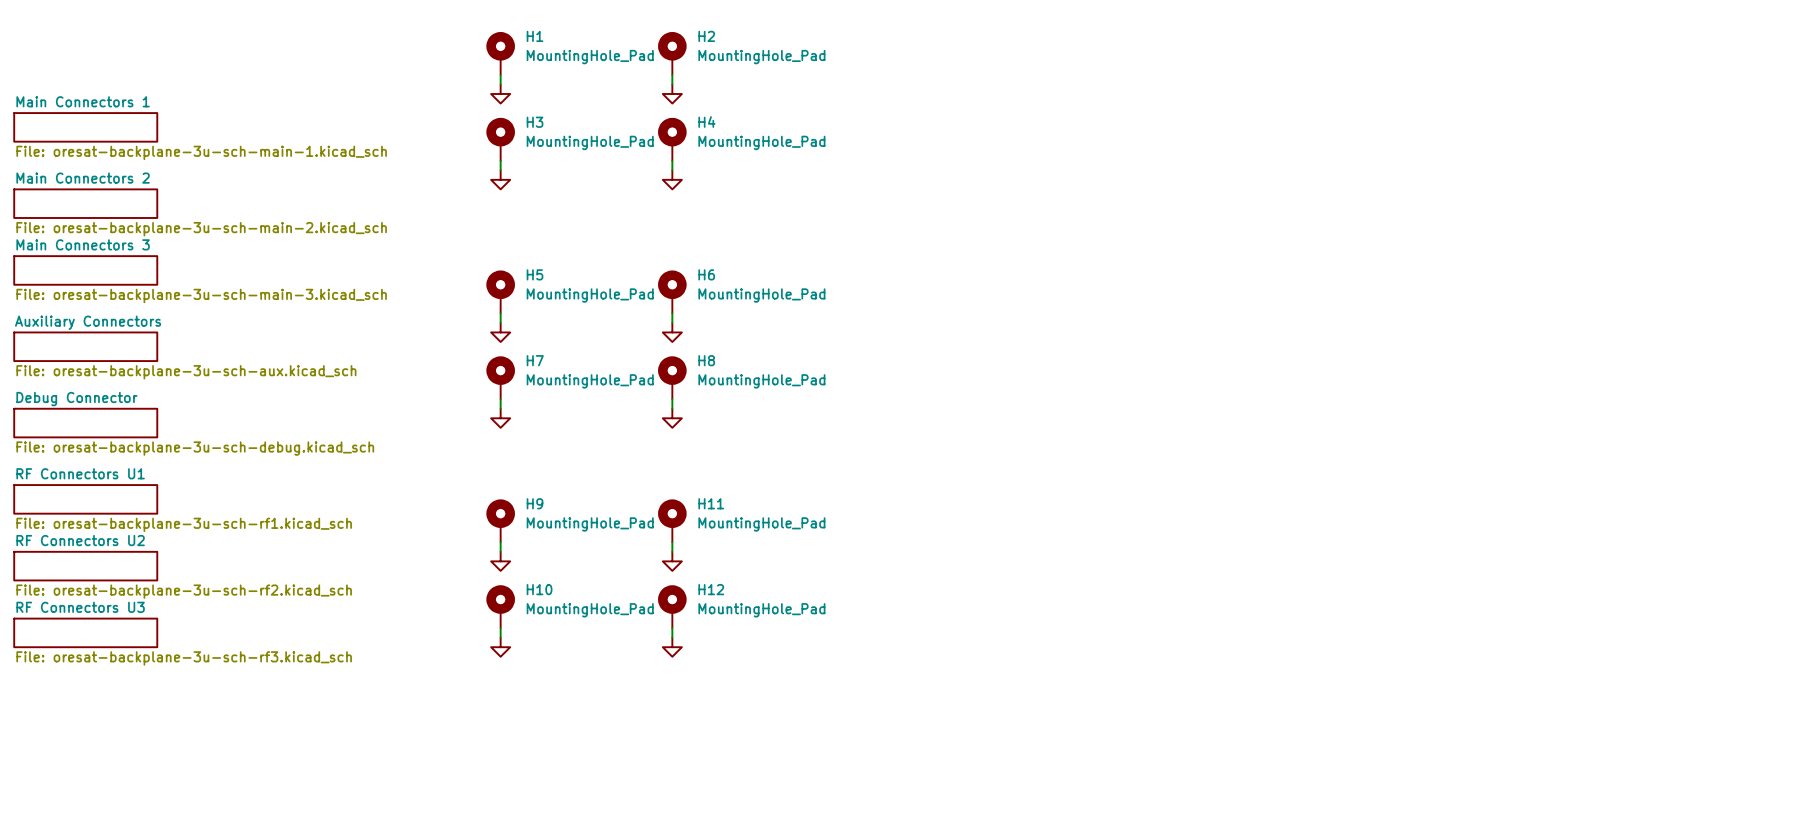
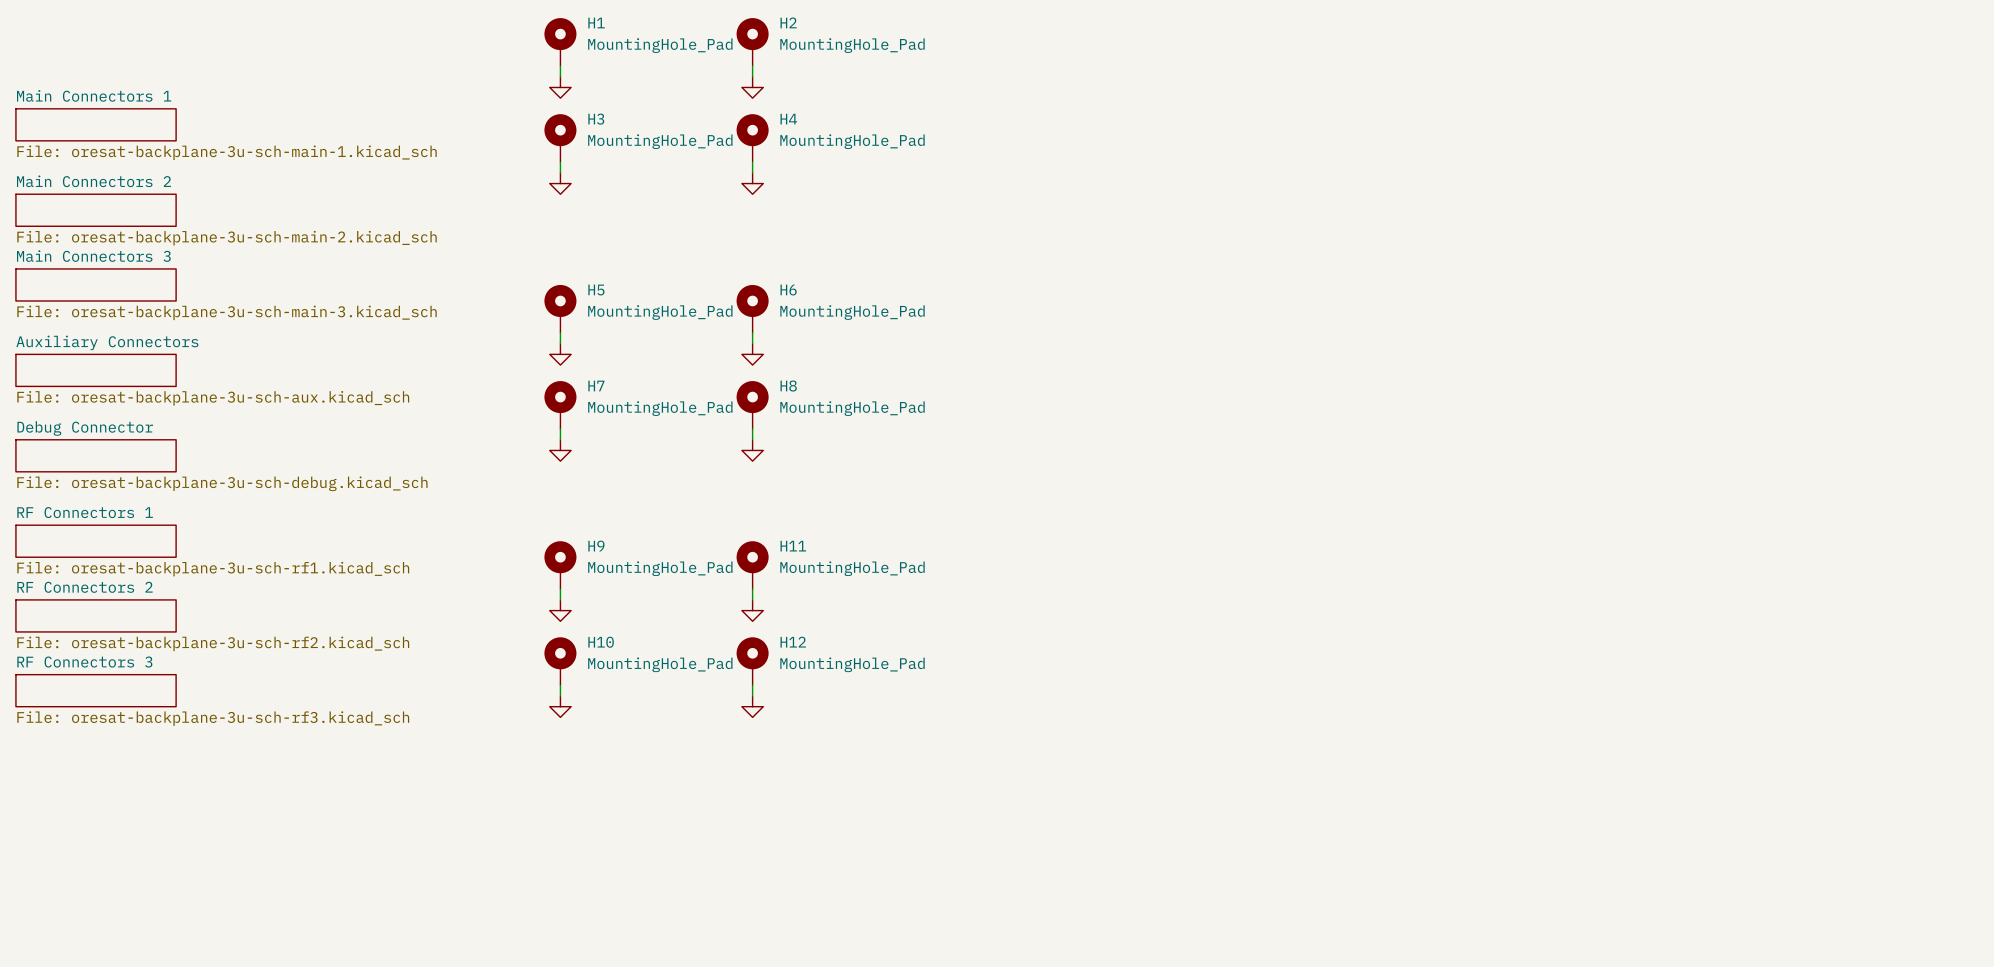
sheet RF Connectors U1 name: RF Connectors U1 (80, 473) -> RF Connectors 1 (85, 512)
sheet RF Connectors U2 name: RF Connectors U2 (80, 540) -> RF Connectors 2 (84, 587)
sheet RF Connectors U3 name: RF Connectors U3 (80, 607) -> RF Connectors 3 (84, 662)

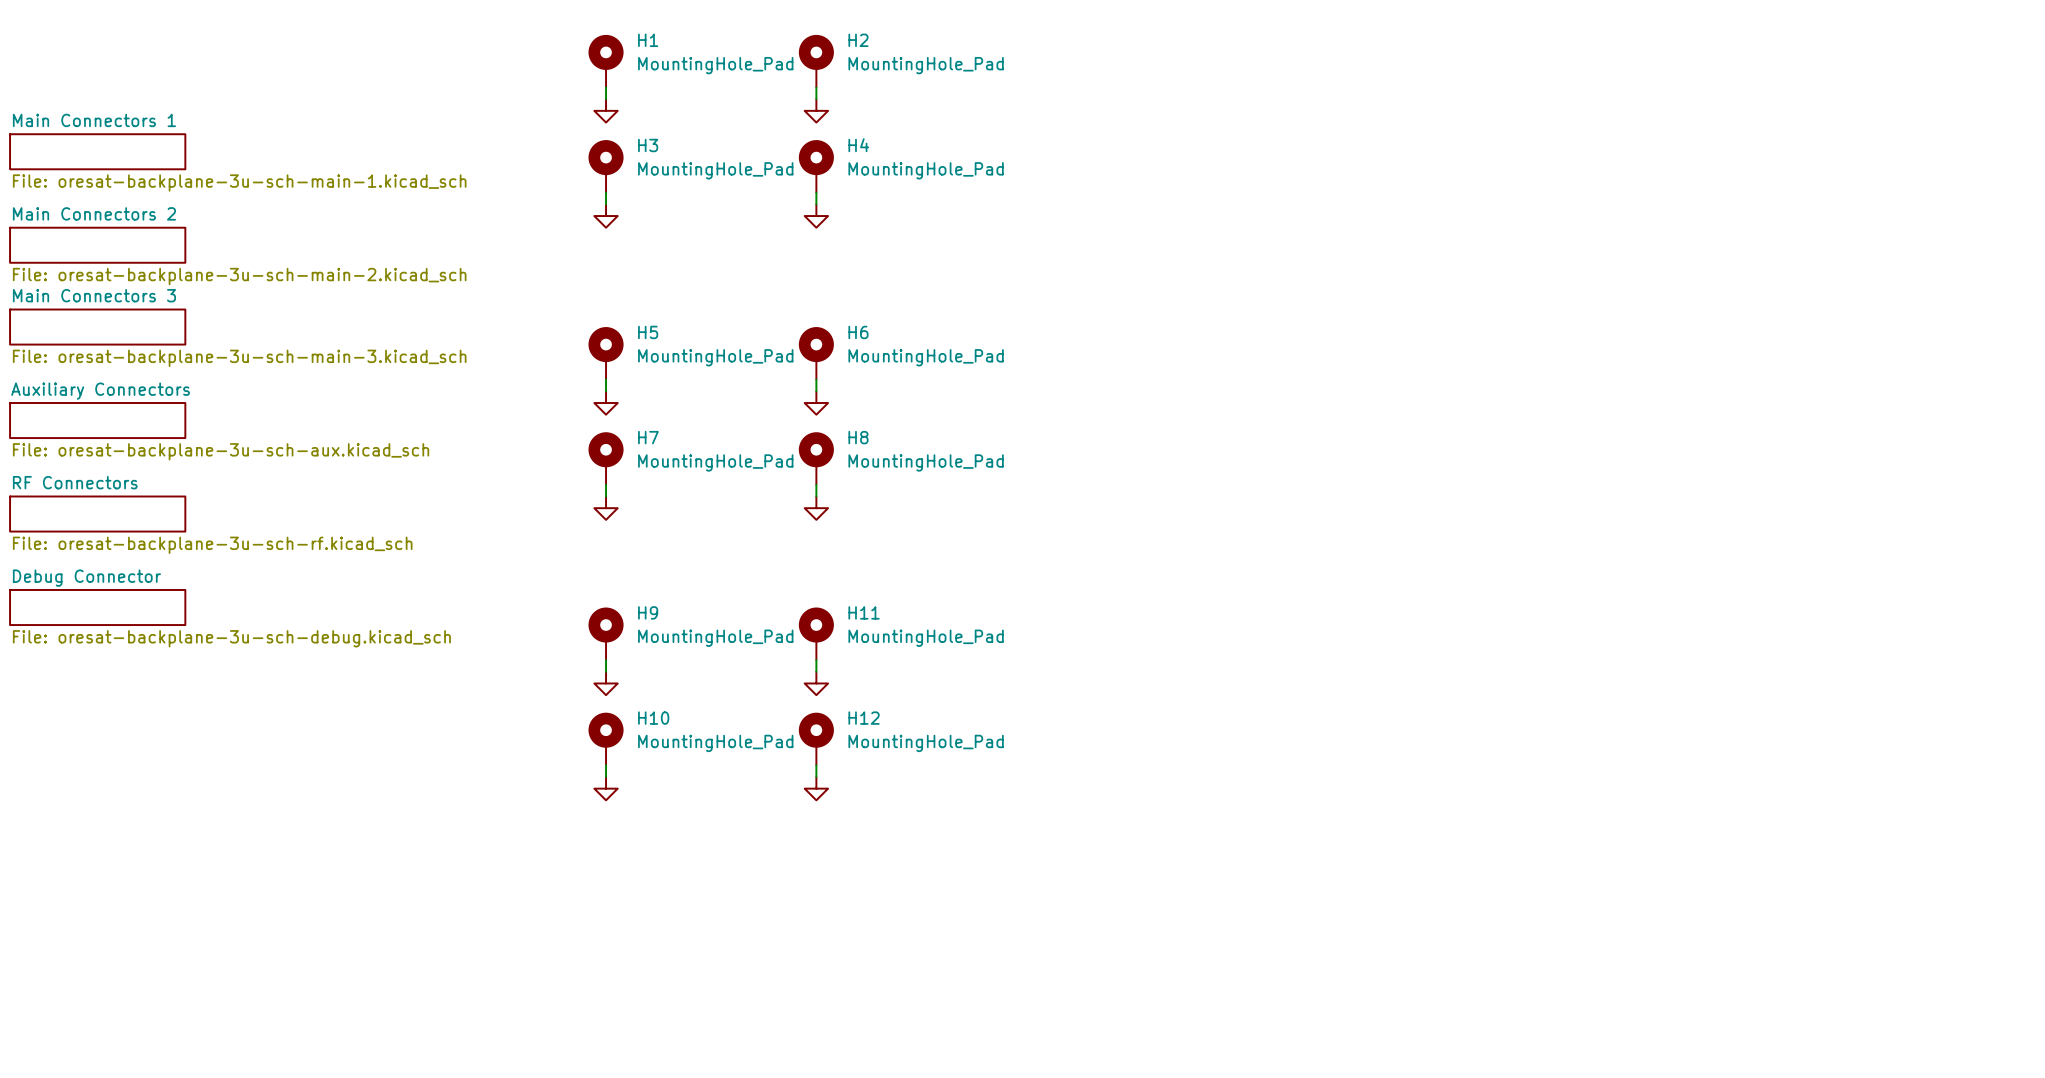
sheet Debug Connector name: Debug Connector (85, 428) -> RF Connectors (75, 482)
sheet Debug Connector value: File: oresat-backplane-3u-sch-debug.kicad_sch (222, 483) -> File: oresat-backplane-3u-sch-rf.kicad_sch (212, 545)
sheet RF Connectors 1 name: RF Connectors 1 (85, 512) -> Debug Connector (86, 578)
sheet RF Connectors 1 value: File: oresat-backplane-3u-sch-rf1.kicad_sch (213, 569) -> File: oresat-backplane-3u-sch-debug.kicad_sch (231, 638)
sheet RF Connectors 2: File: oresat-backplane-3u-sch-rf2.kicad_sch (96, 615) -> none
sheet RF Connectors 3: File: oresat-backplane-3u-sch-rf3.kicad_sch (96, 690) -> none

